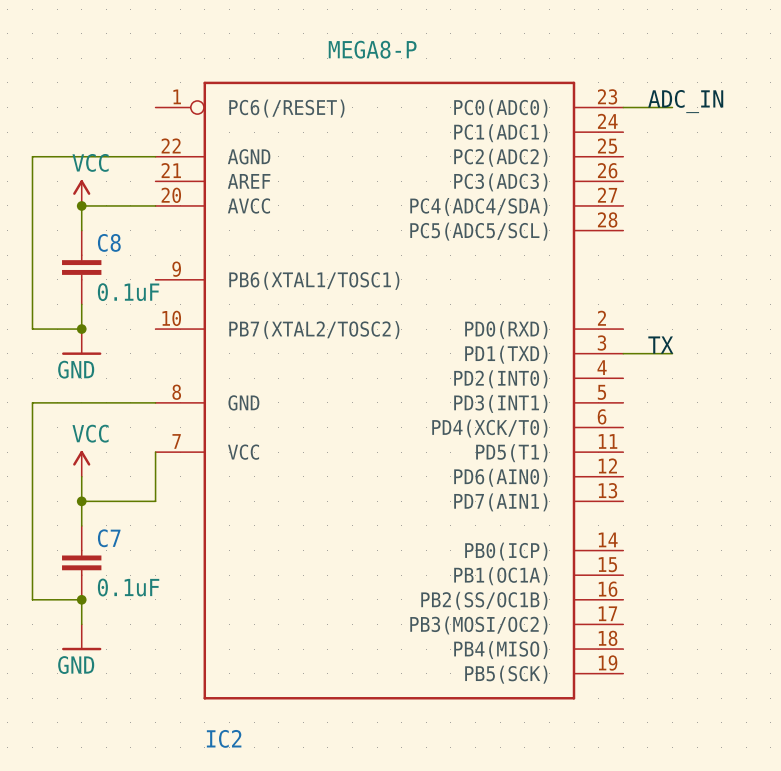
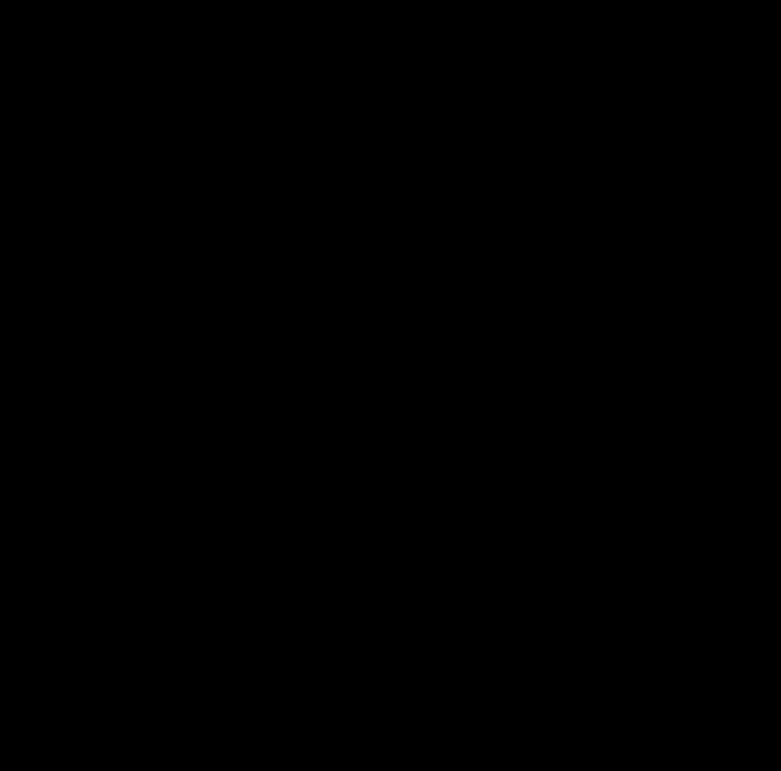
label: ADC_IN (685, 101) -> none
wire: (623, 107) (672, 107) -> none
wire: (155, 156) (32, 156) (32, 329) (81, 329) (81, 304) -> none
power symbol: VCC (81, 193) -> none
junction: (81, 205) -> none
wire: (155, 205) (81, 205) (81, 230) -> none
C8: 0.1uF (81, 267) -> none
junction: (81, 329) -> none
power symbol: GND (81, 341) -> none
label: TX (660, 345) -> none
wire: (623, 353) (672, 353) -> none
IC2: MEGA8-P (389, 390) -> none
wire: (155, 402) (32, 402) (32, 599) (81, 599) (81, 624) -> none
wire: (155, 452) (155, 501) (81, 501) -> none
power symbol: VCC (81, 463) -> none
wire: (81, 476) (81, 525) -> none
junction: (81, 501) -> none
C7: 0.1uF (81, 562) -> none
junction: (81, 599) -> none
power symbol: GND (81, 637) -> none

